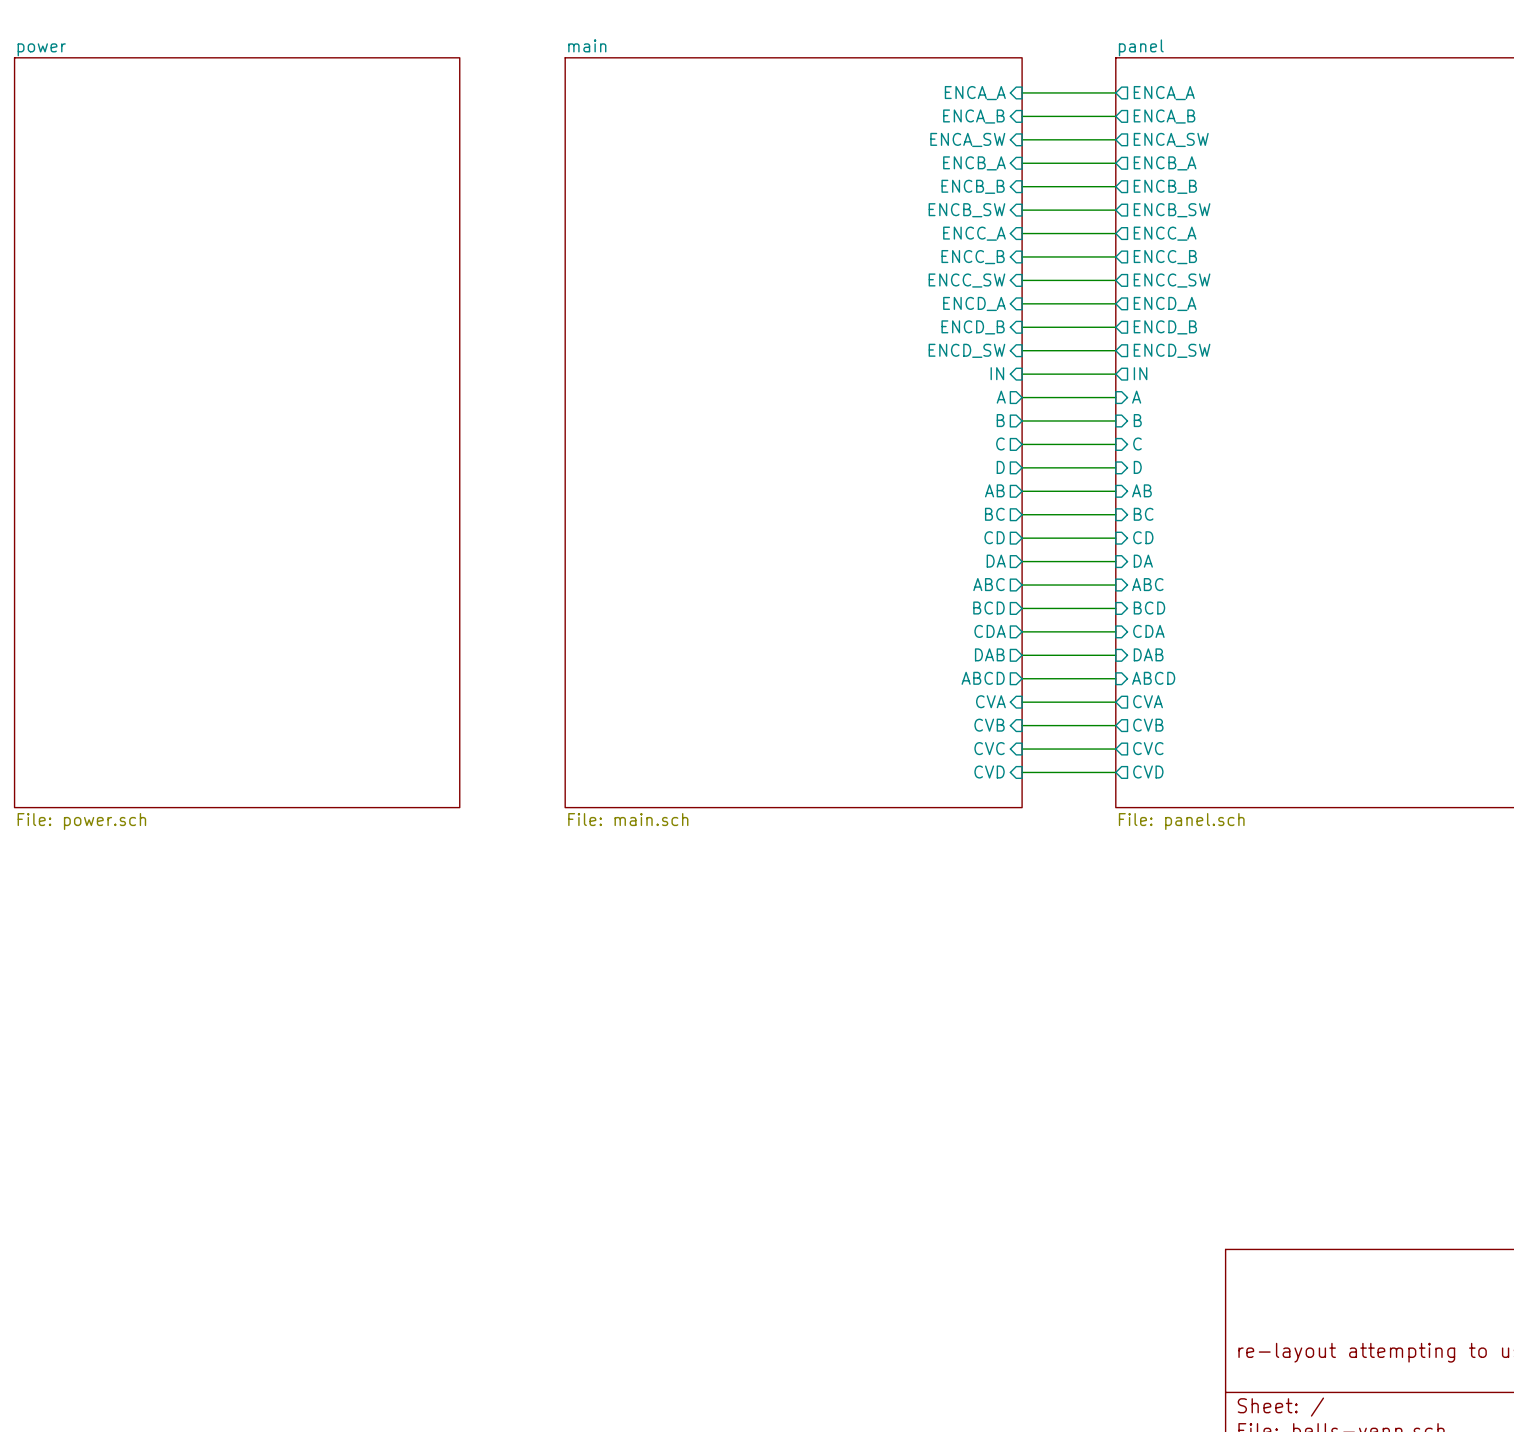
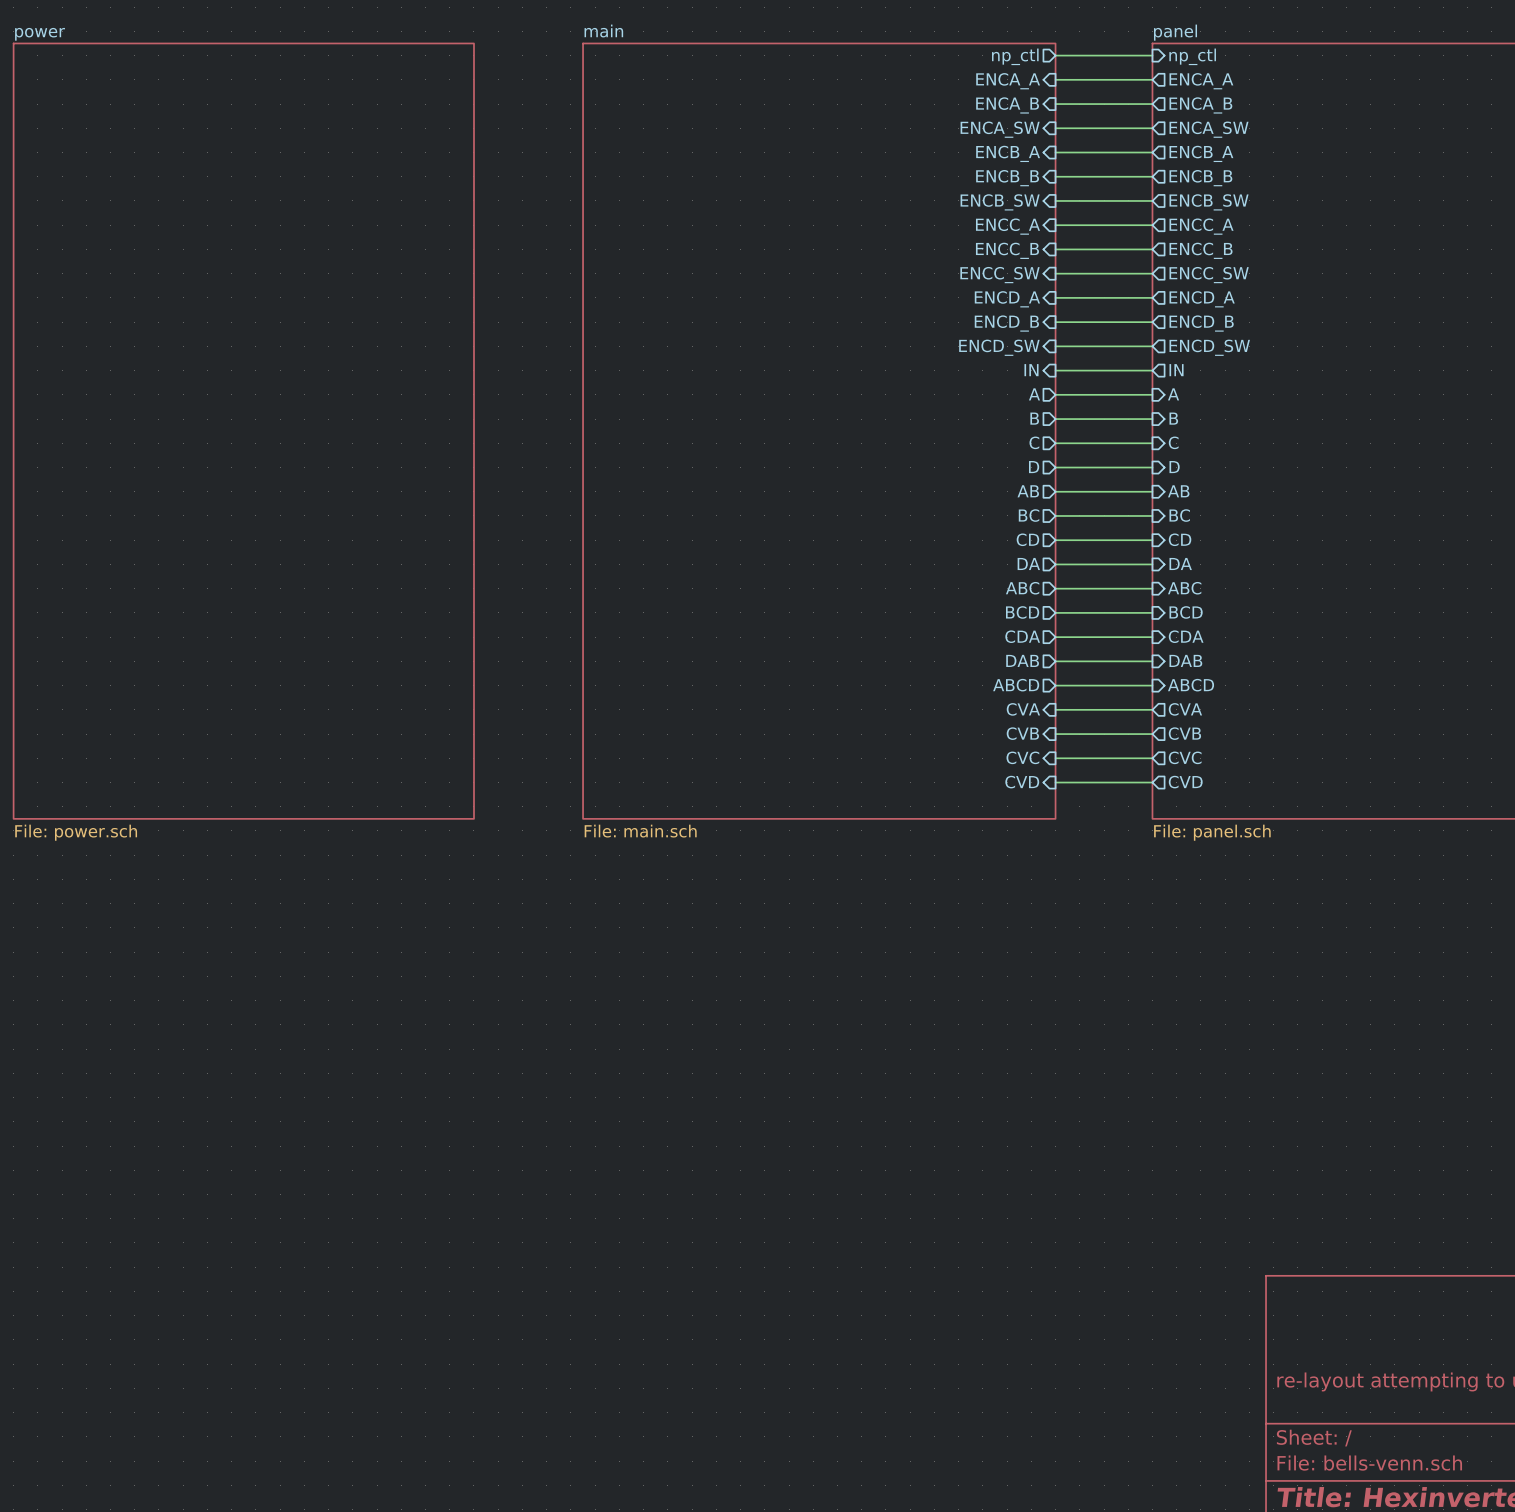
wire: none -> (1055, 55) (1152, 55)
sheet pin: none -> np_ctl (1015, 56)
sheet pin: none -> np_ctl (1192, 56)

